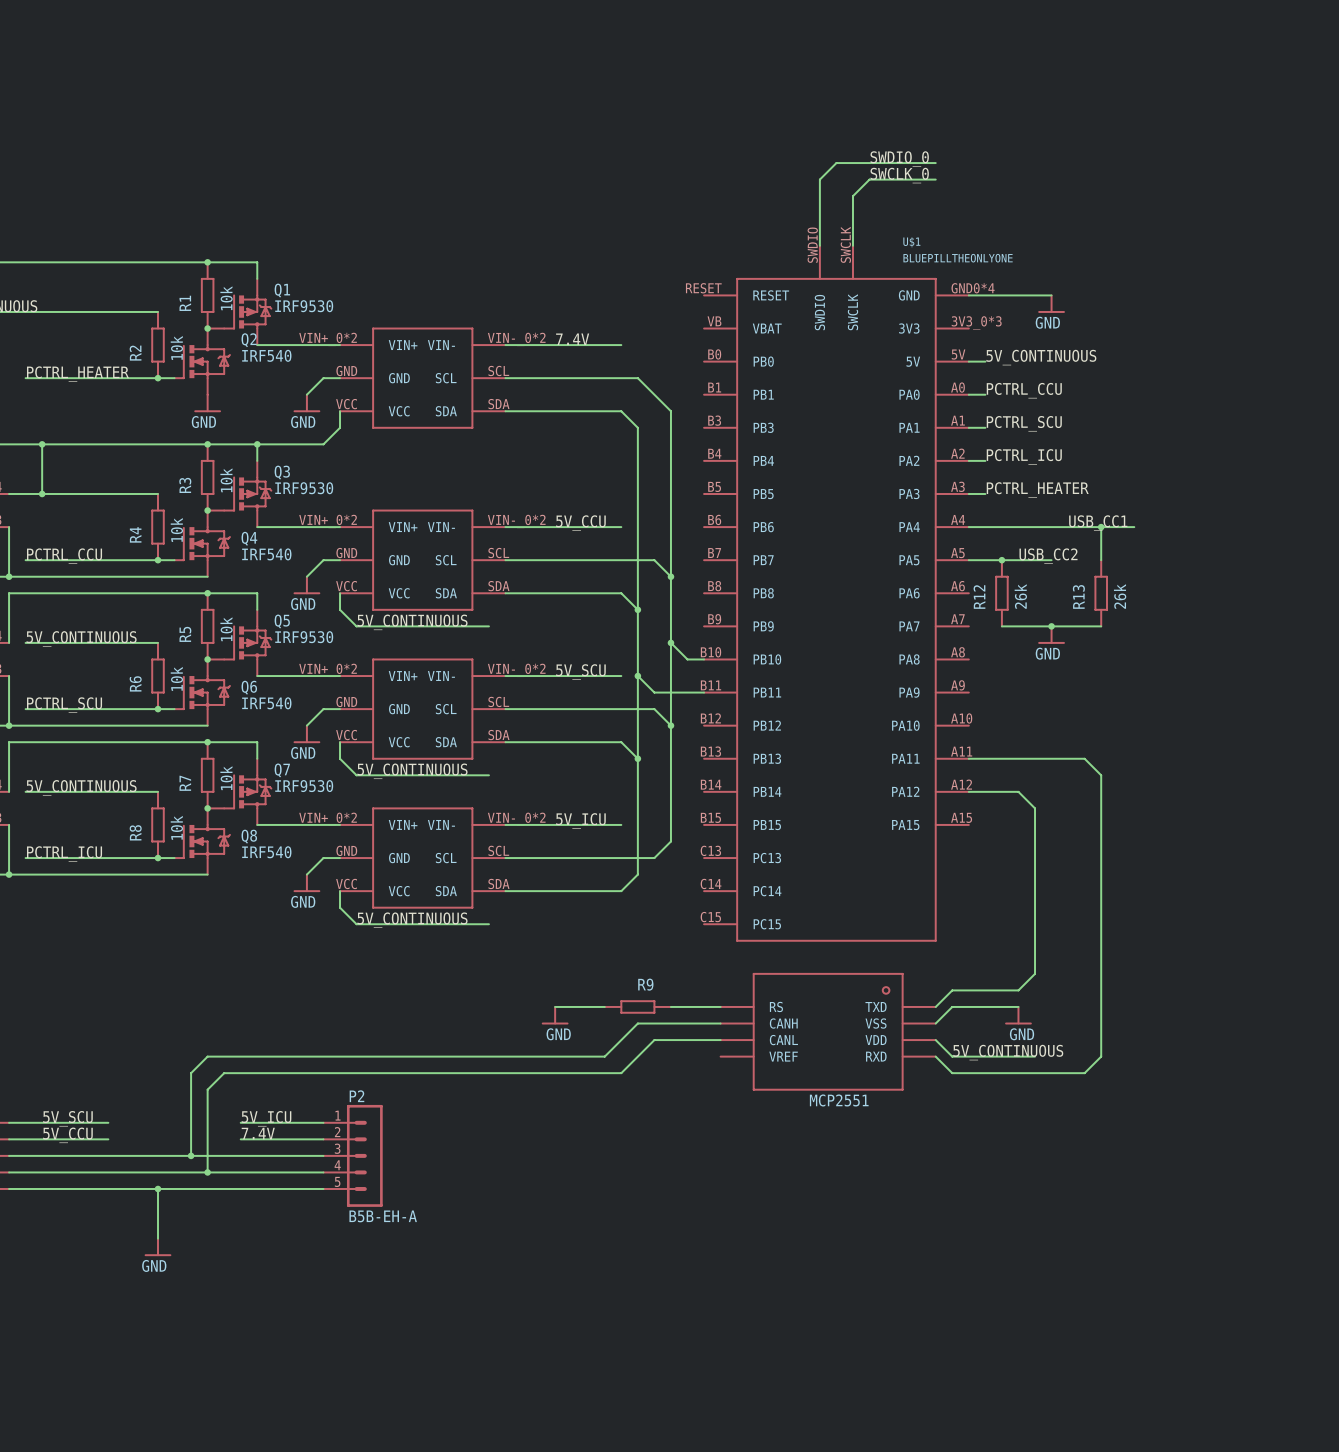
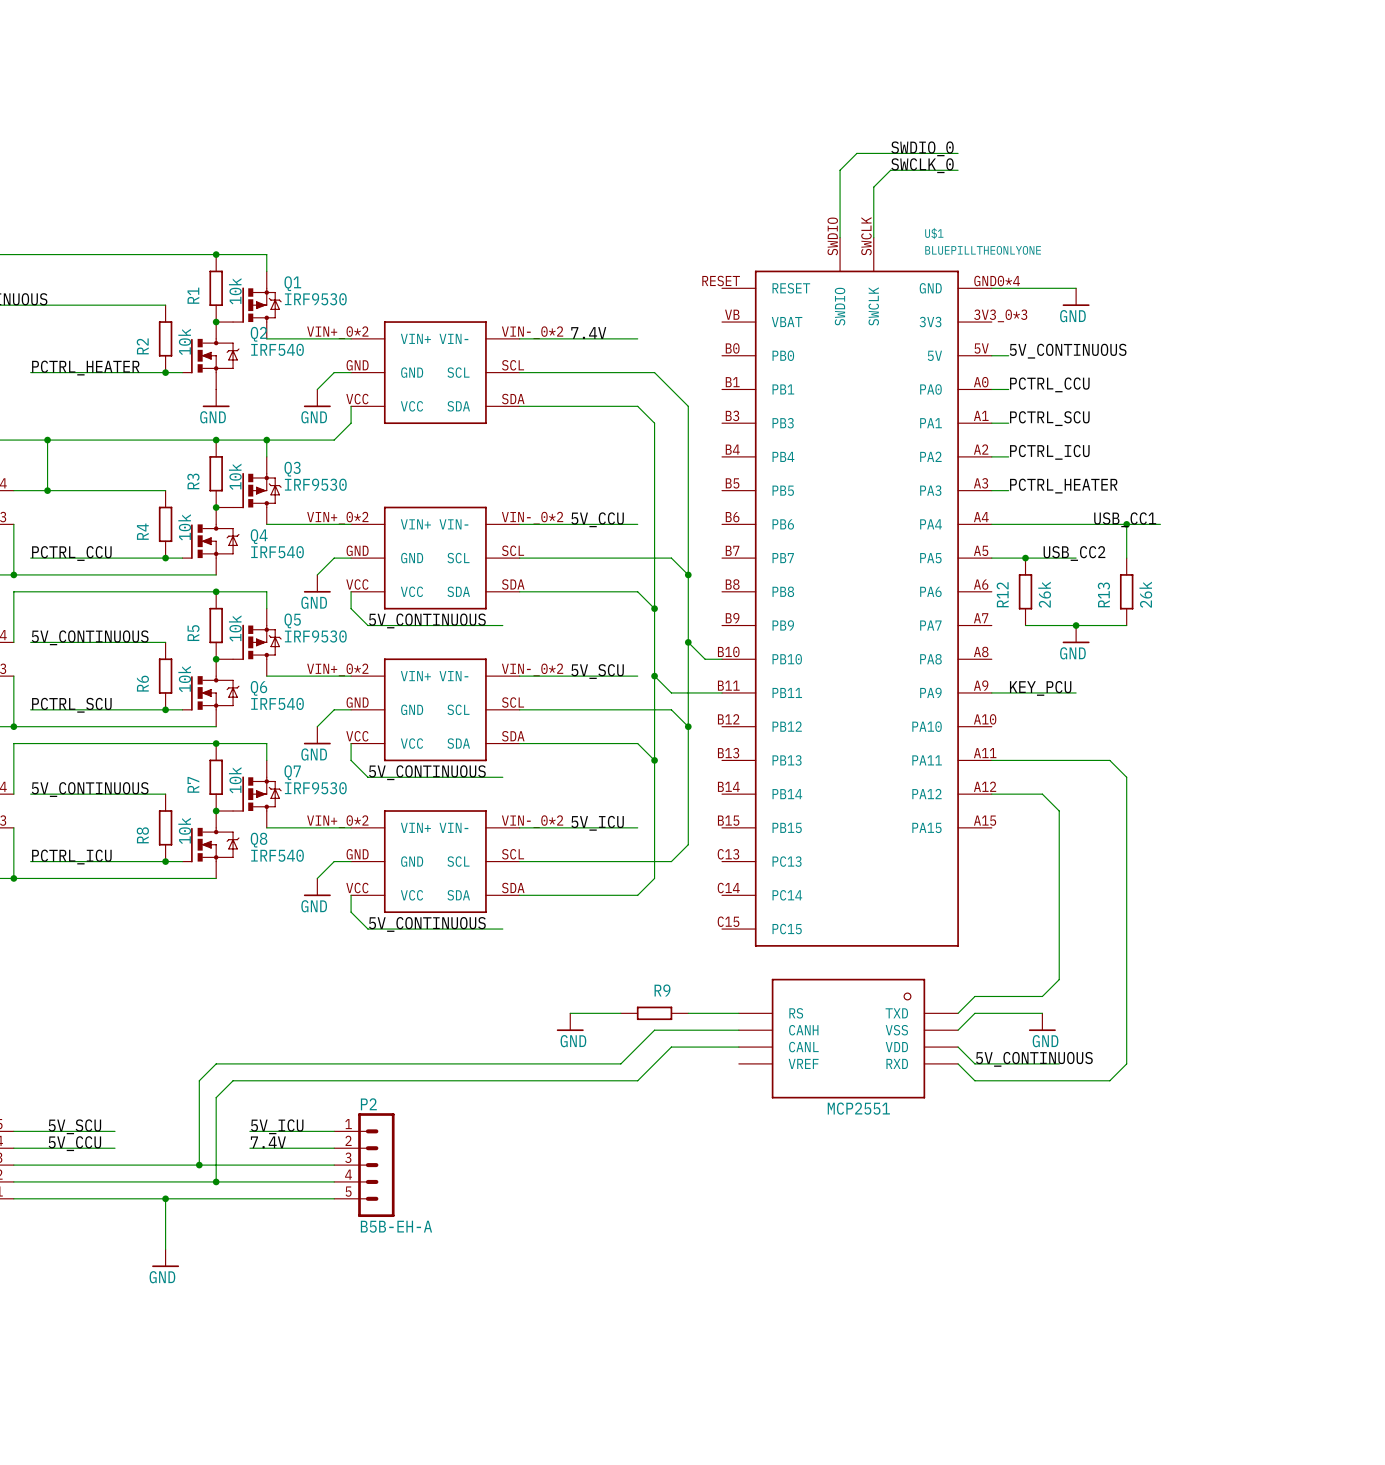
label: none -> KEY_PCU (1040, 688)
wire: none -> (991, 692) (1076, 692)

